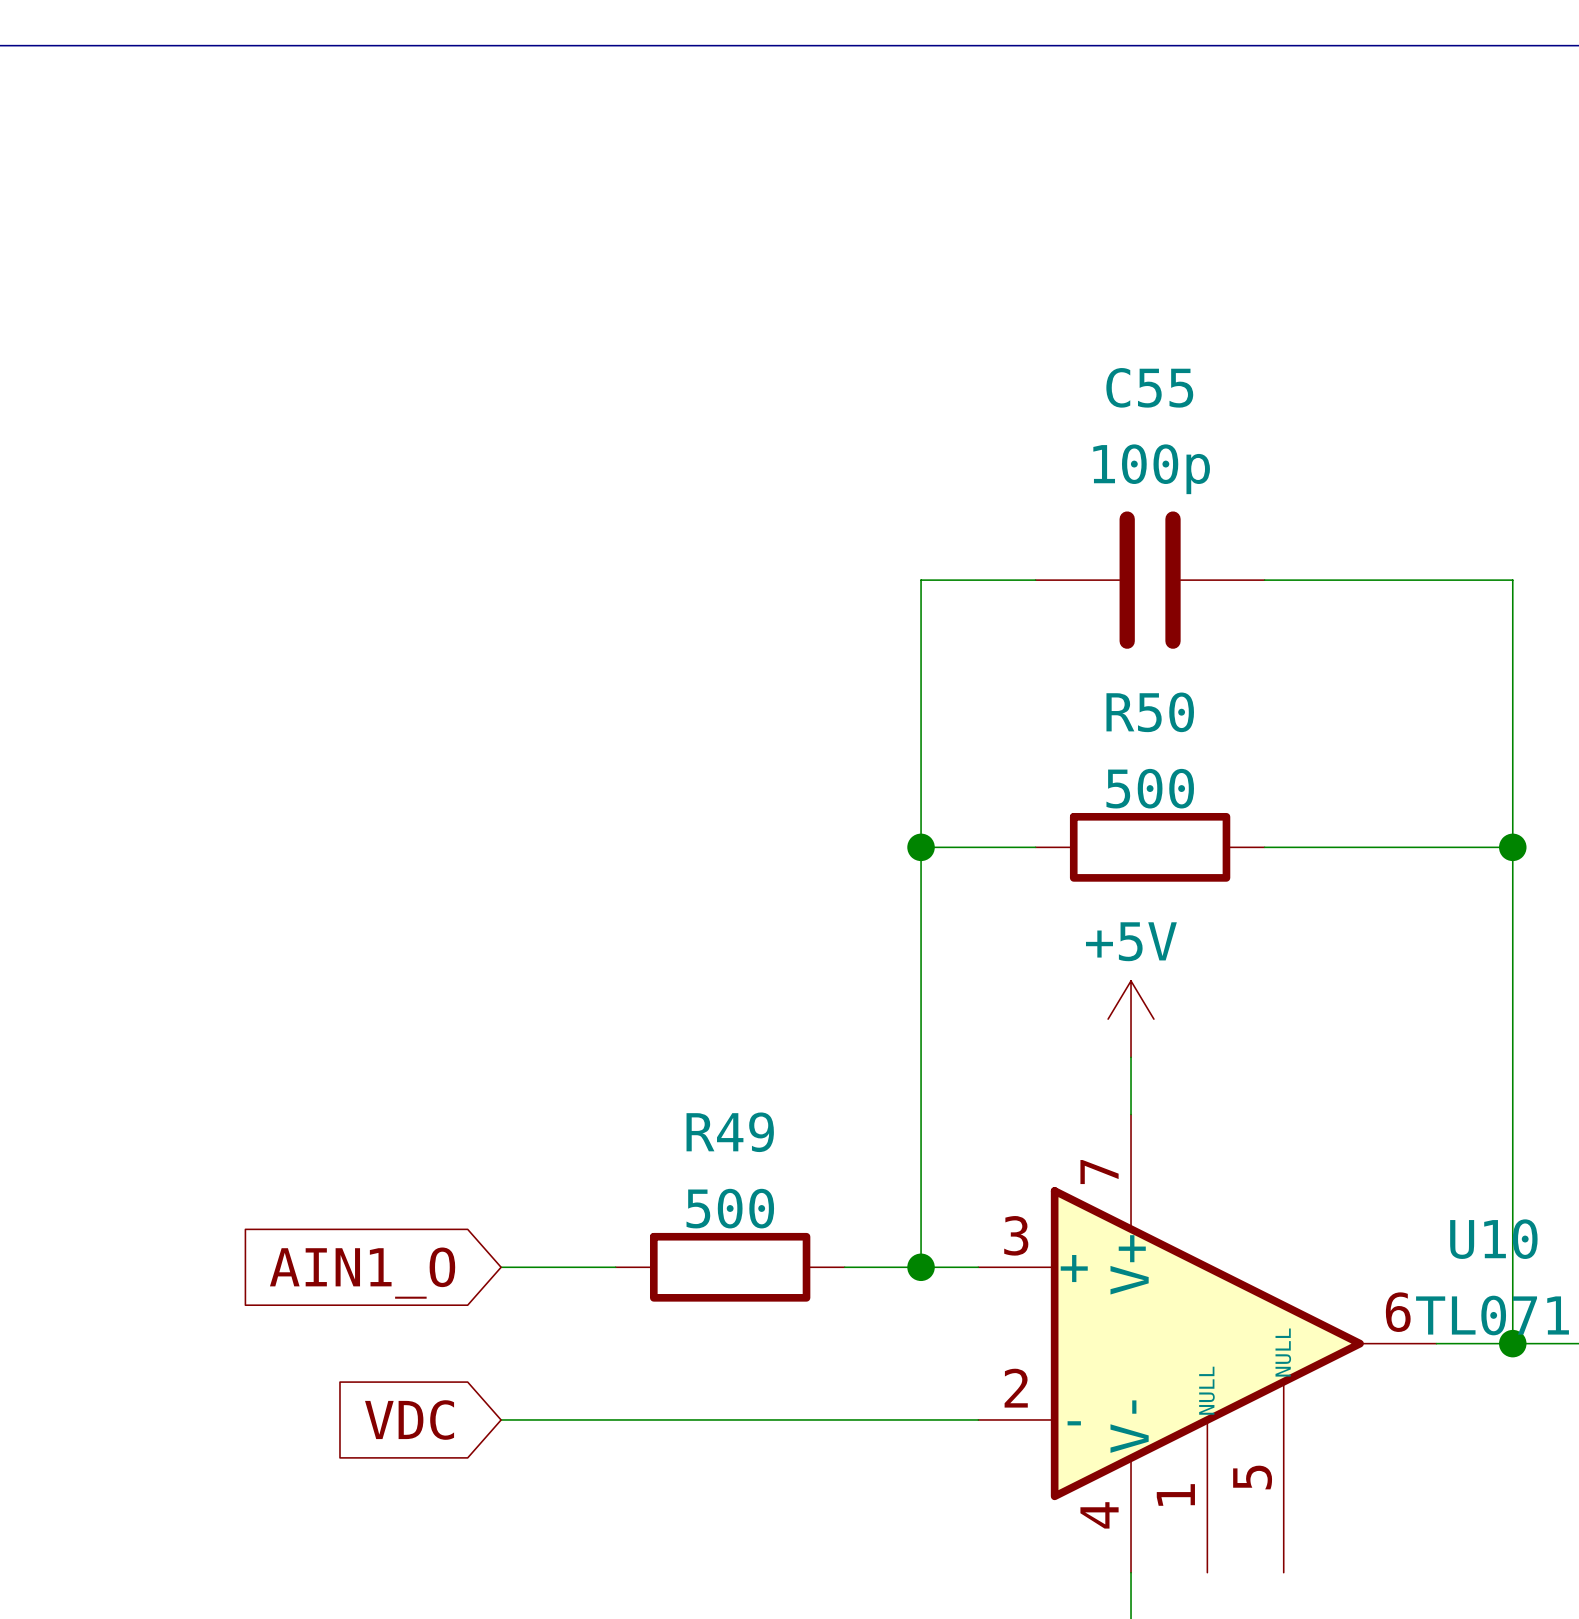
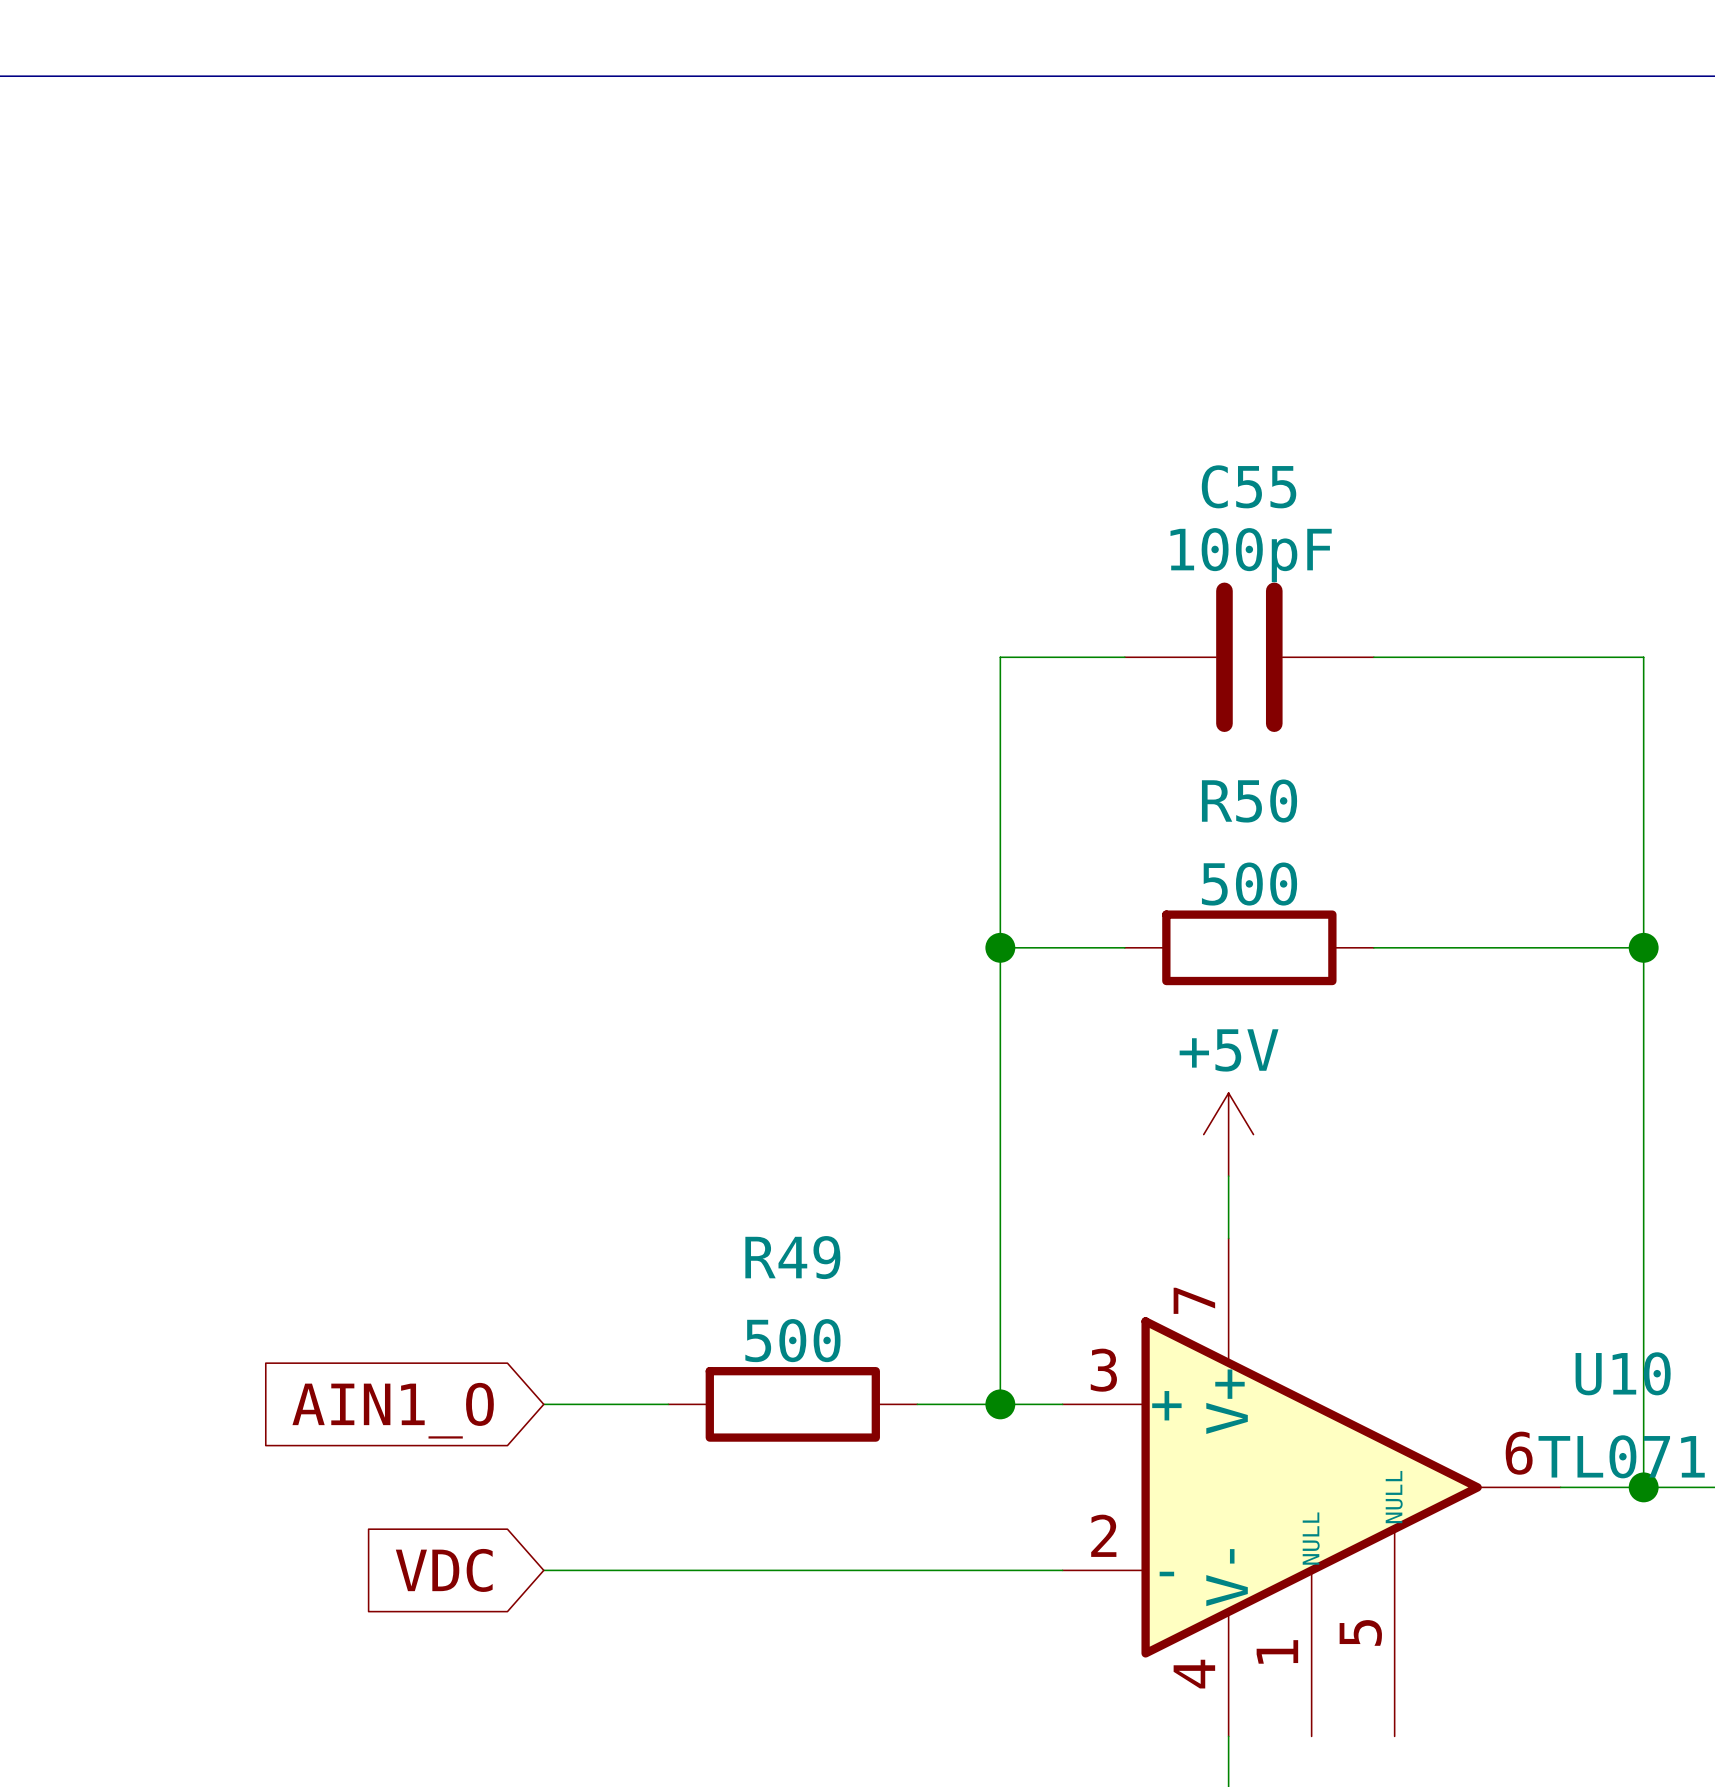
C55 name position: C55 (1149, 387) -> C55 (1249, 486)
C55 value: 100p (1151, 469) -> 100pF (1251, 555)

